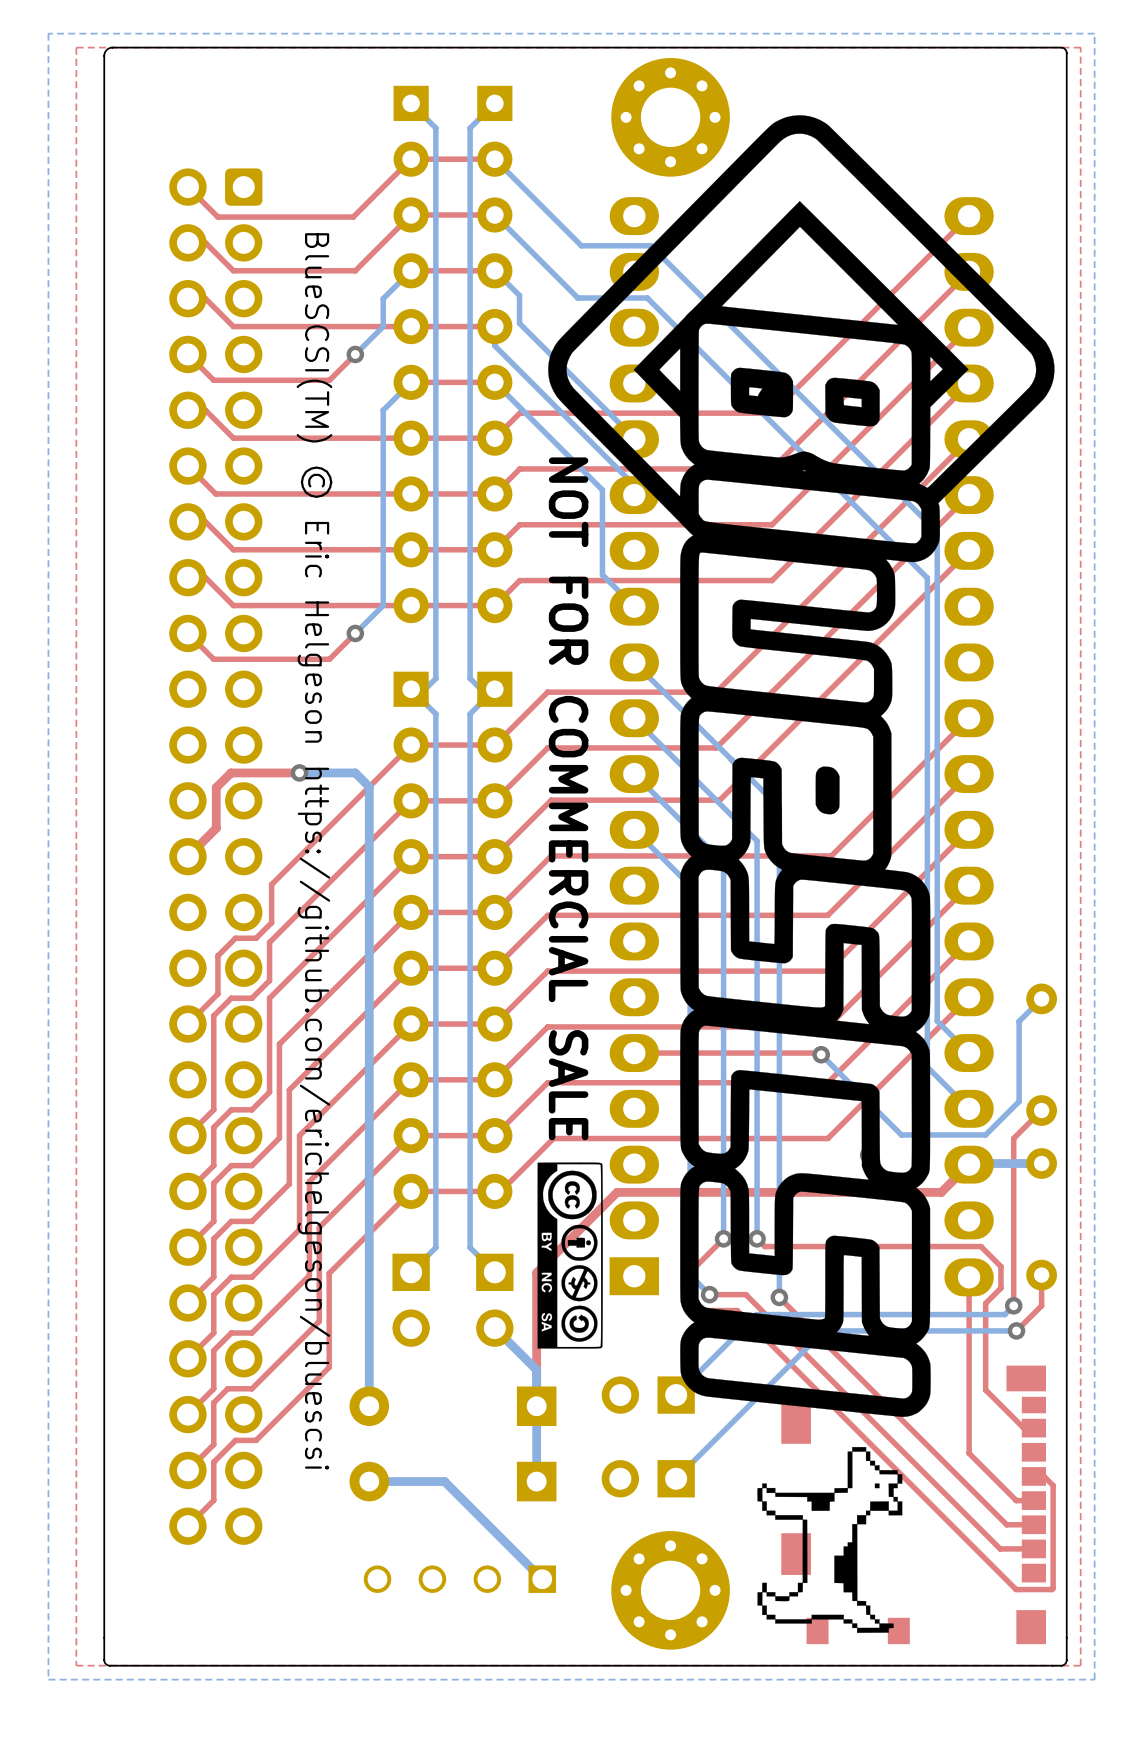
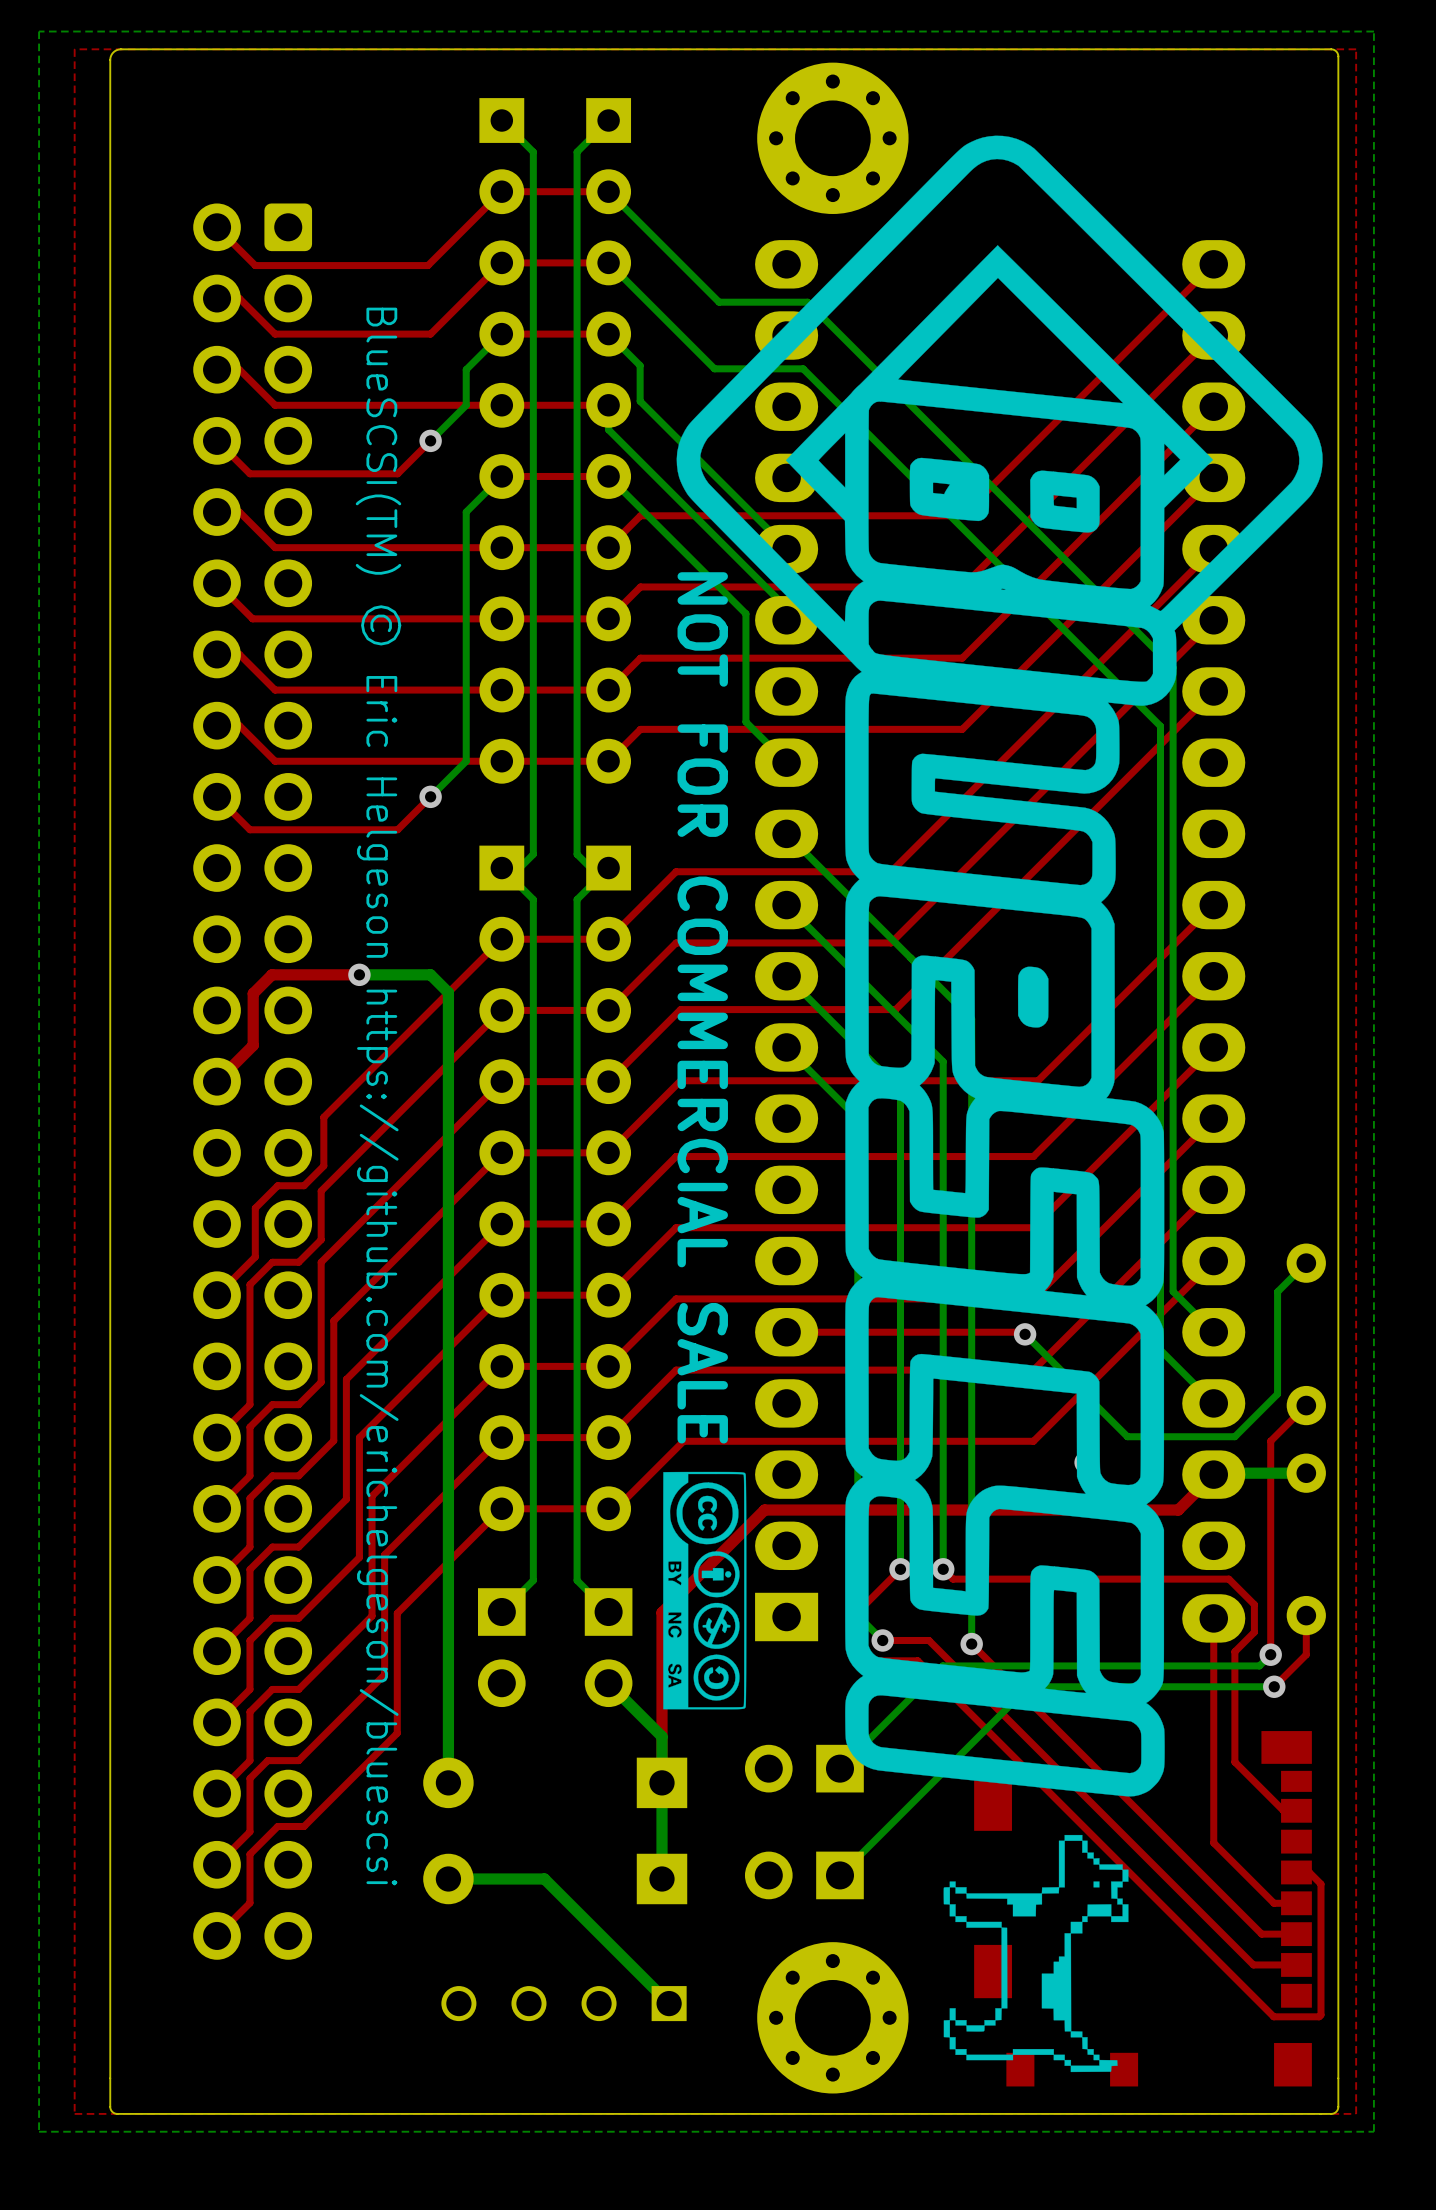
text position: BlueSCSI(TM) © Eric Helgeson https://github.com/erichelgeson/bluescsi (314, 851) -> BlueSCSI(TM) © Eric Helgeson https://github.com/erichelgeson/bluescsi (378, 1096)

